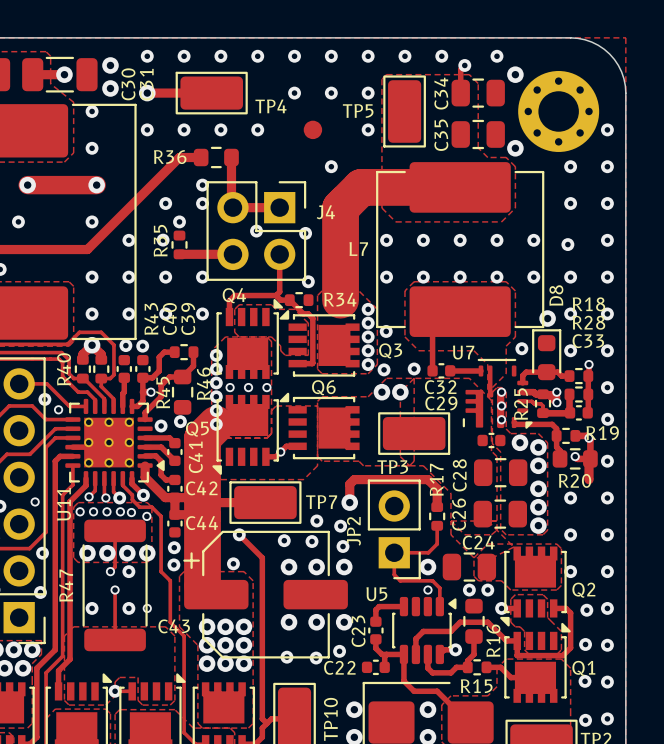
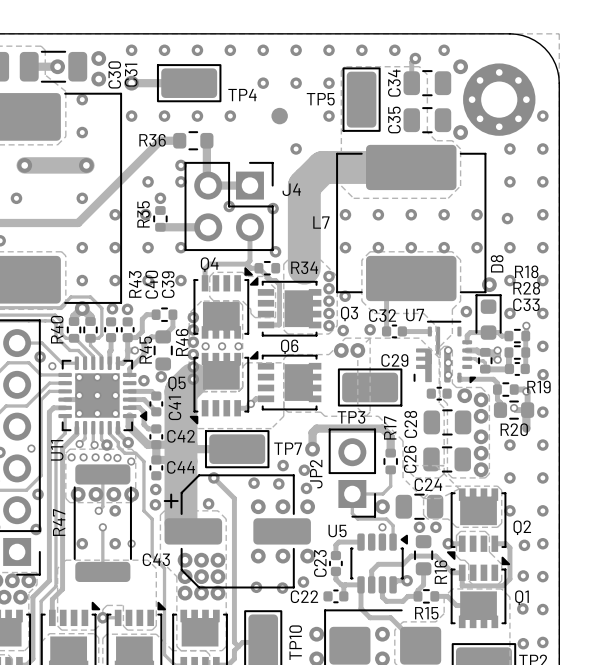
C32 name position: C32 (440, 387) -> C32 (382, 315)
R25 name: R25 (520, 404) -> none

